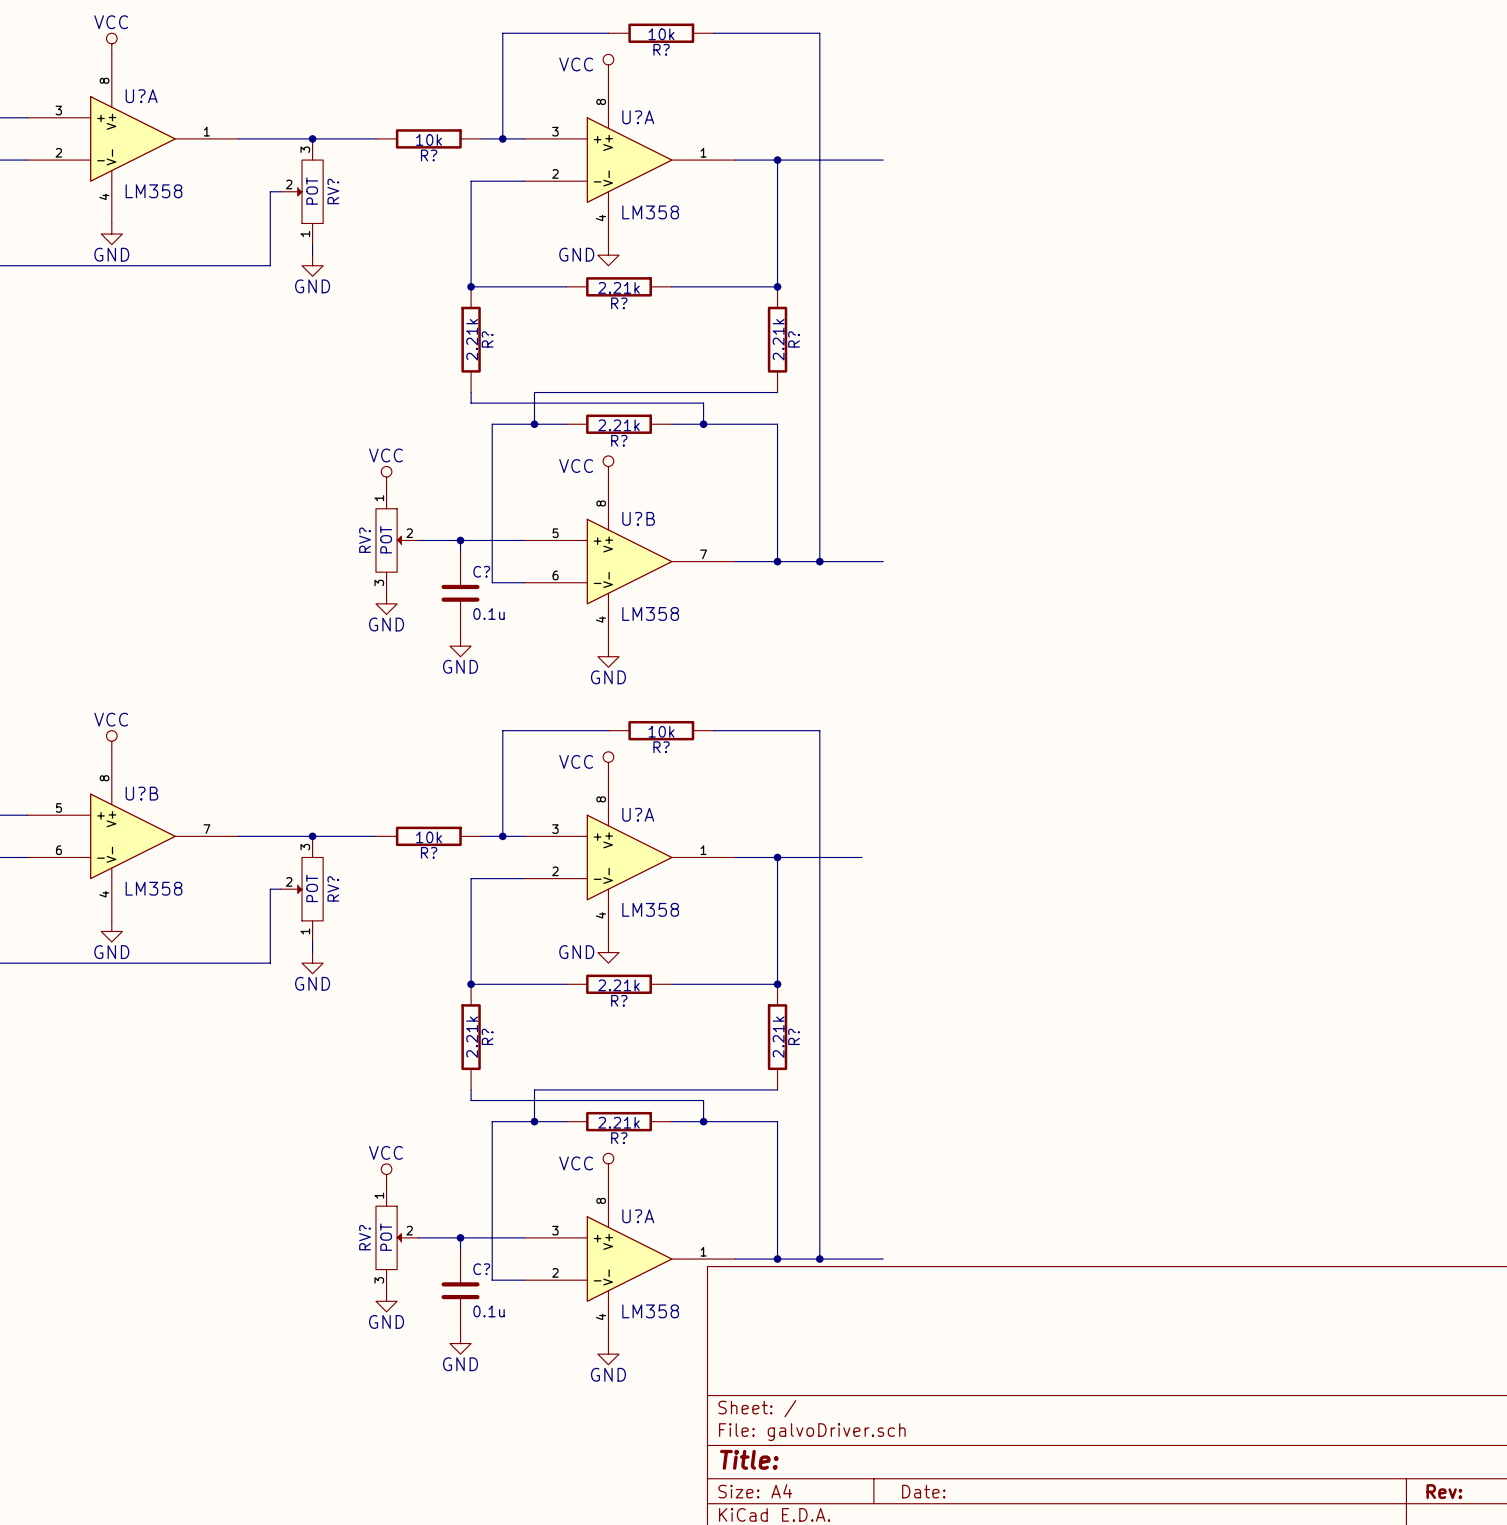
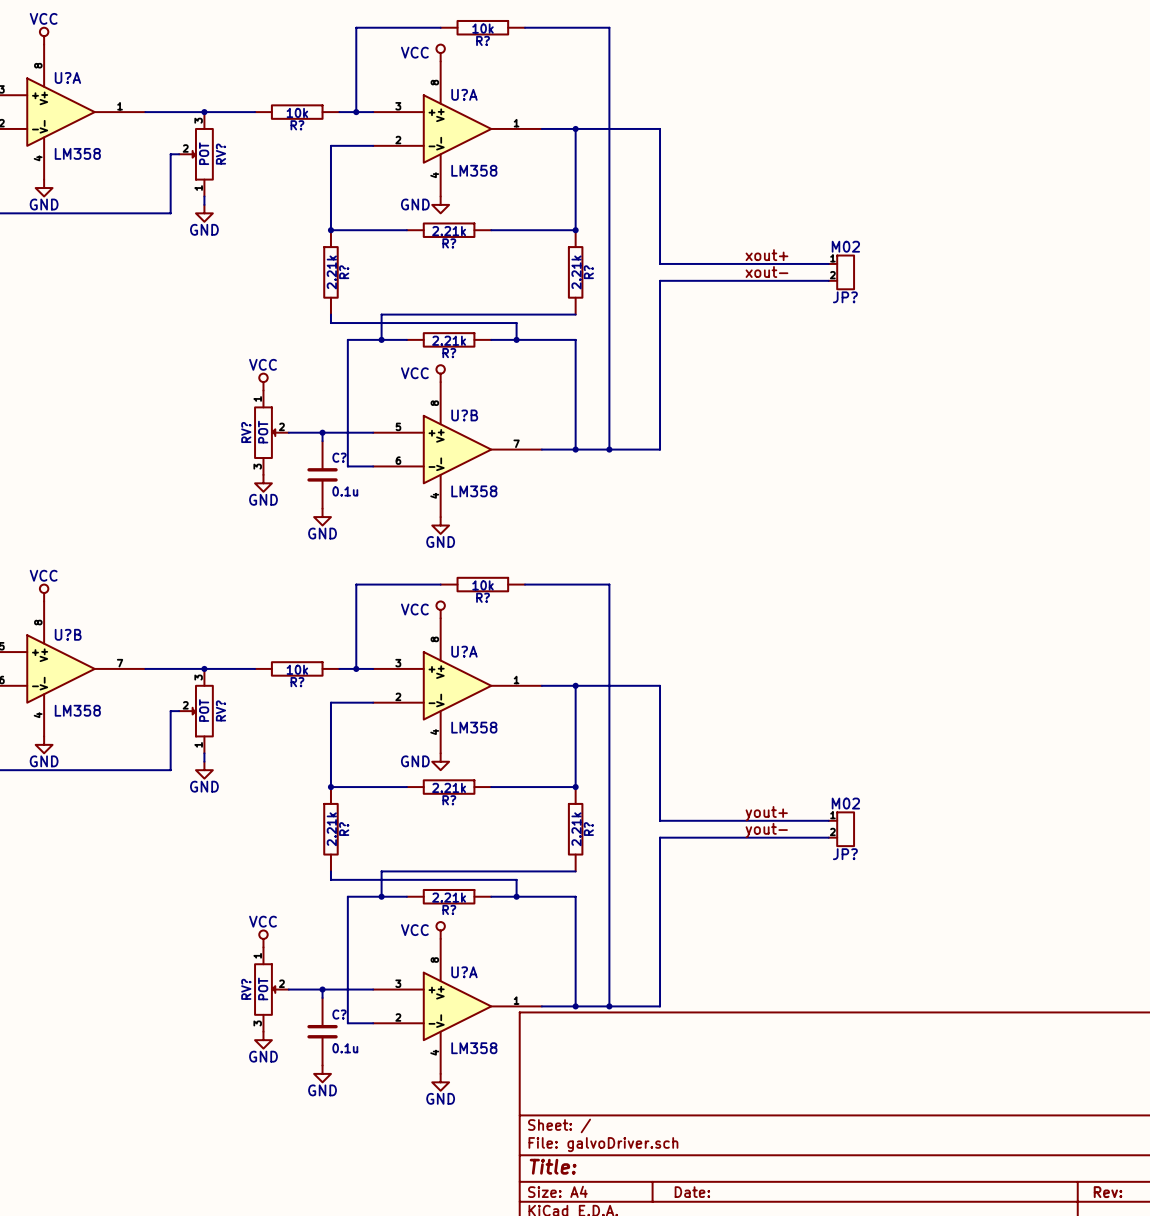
wire: none -> (660, 128) (660, 263) (828, 263)
label: none -> xout+ (766, 255)
label: none -> xout- (766, 272)
JP?: none -> M02 (841, 272)
wire: none -> (828, 280) (660, 280) (660, 449)
wire: none -> (643, 685) (660, 685) (660, 820) (828, 820)
label: none -> yout+ (766, 813)
JP?: none -> M02 (841, 829)
label: none -> yout- (766, 830)
wire: none -> (828, 837) (660, 837) (660, 1006)

